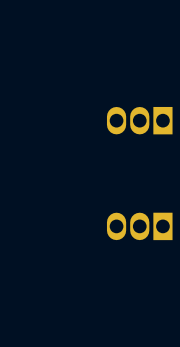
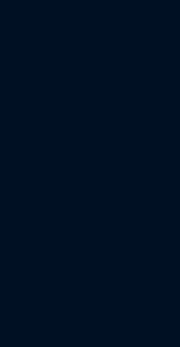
part: (139, 120) -> none
part: (139, 226) -> none

